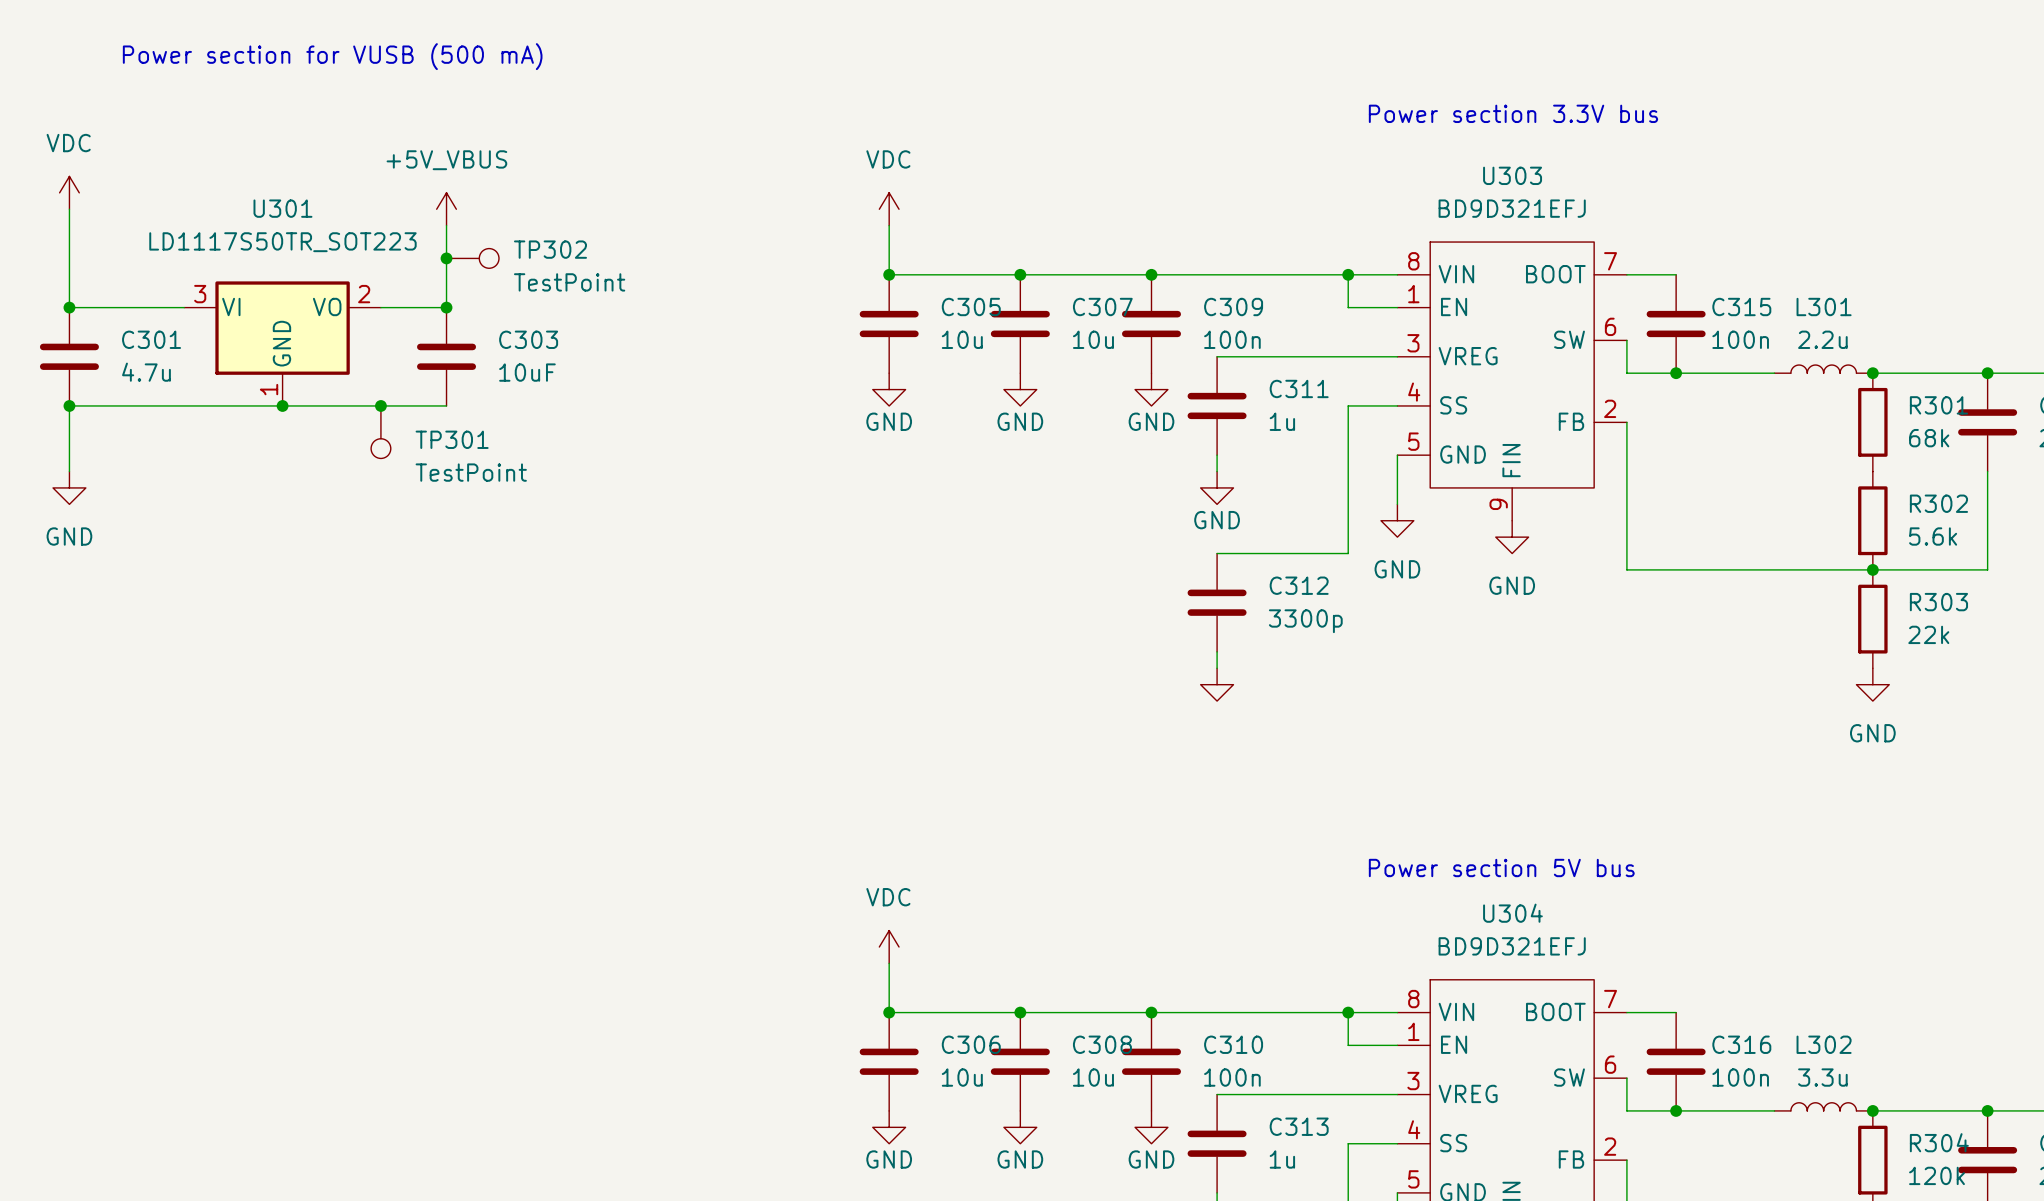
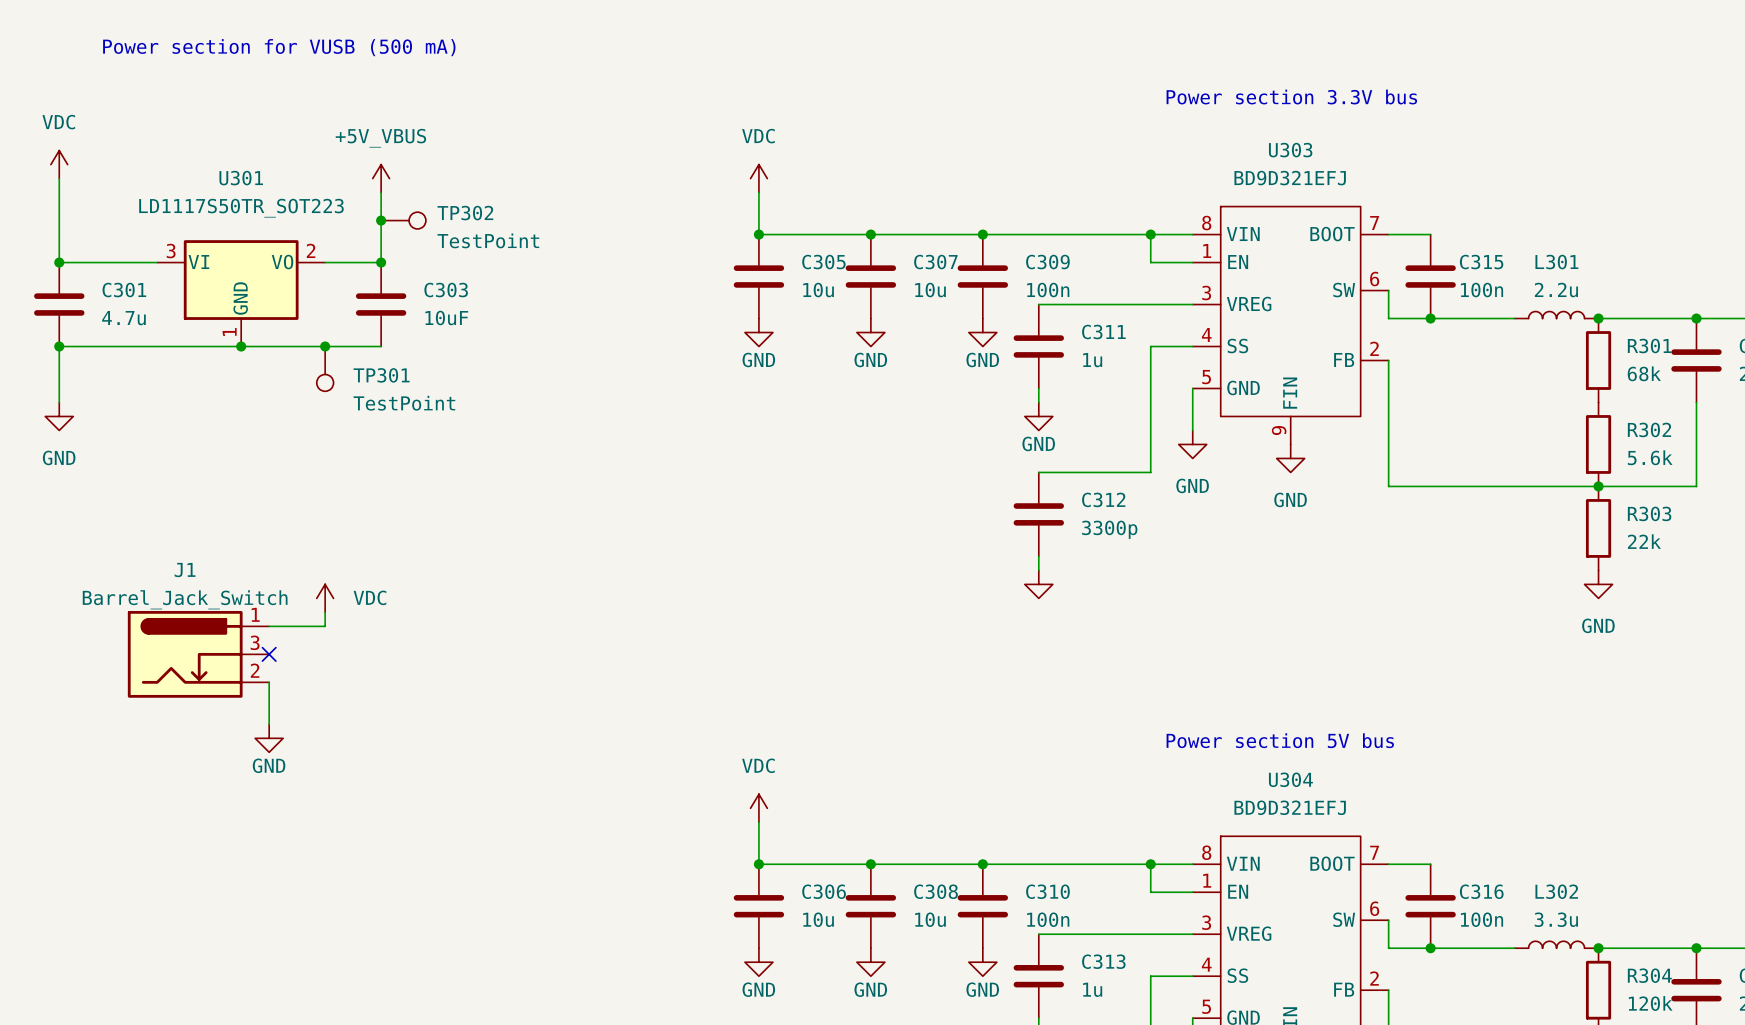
power symbol: none -> VDC (325, 598)
wire: none -> (325, 612) (325, 626) (269, 626)
J1: none -> Barrel_Jack_Switch (198, 654)
no-connect mark: none -> (269, 654)
wire: none -> (269, 682) (269, 724)
power symbol: none -> GND (269, 738)

